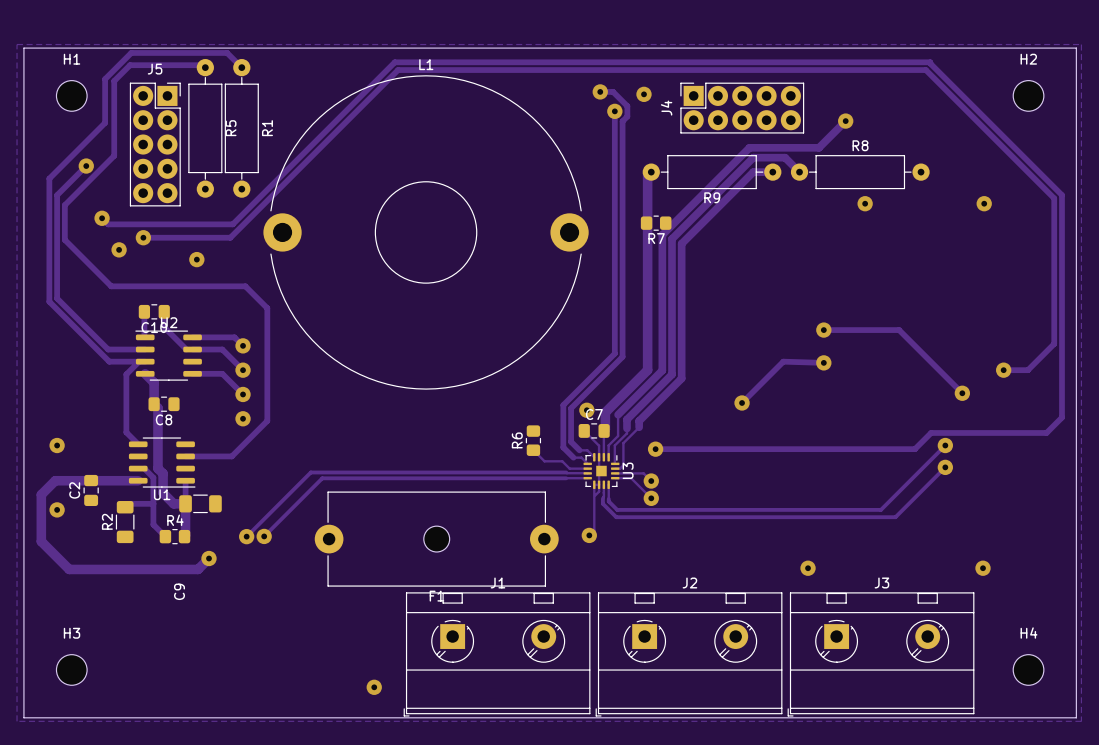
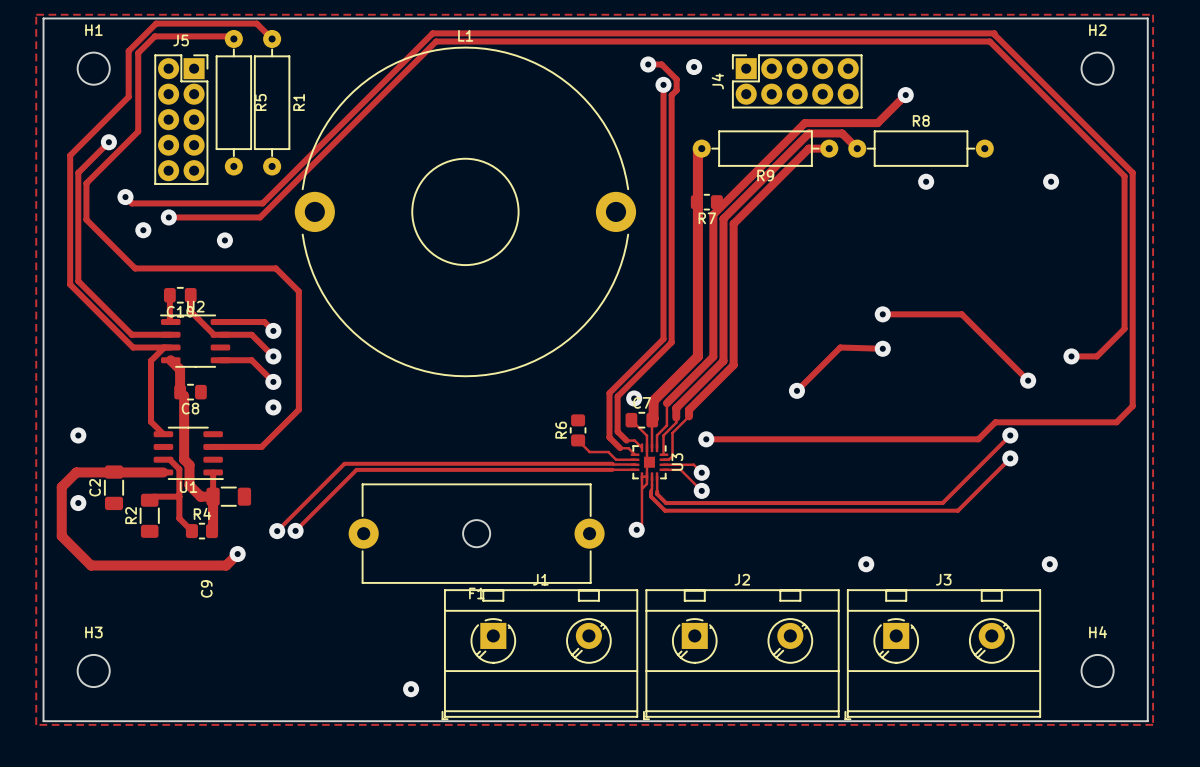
C2 footprint: [83, 474, 99, 507] -> [104, 465, 124, 511]

